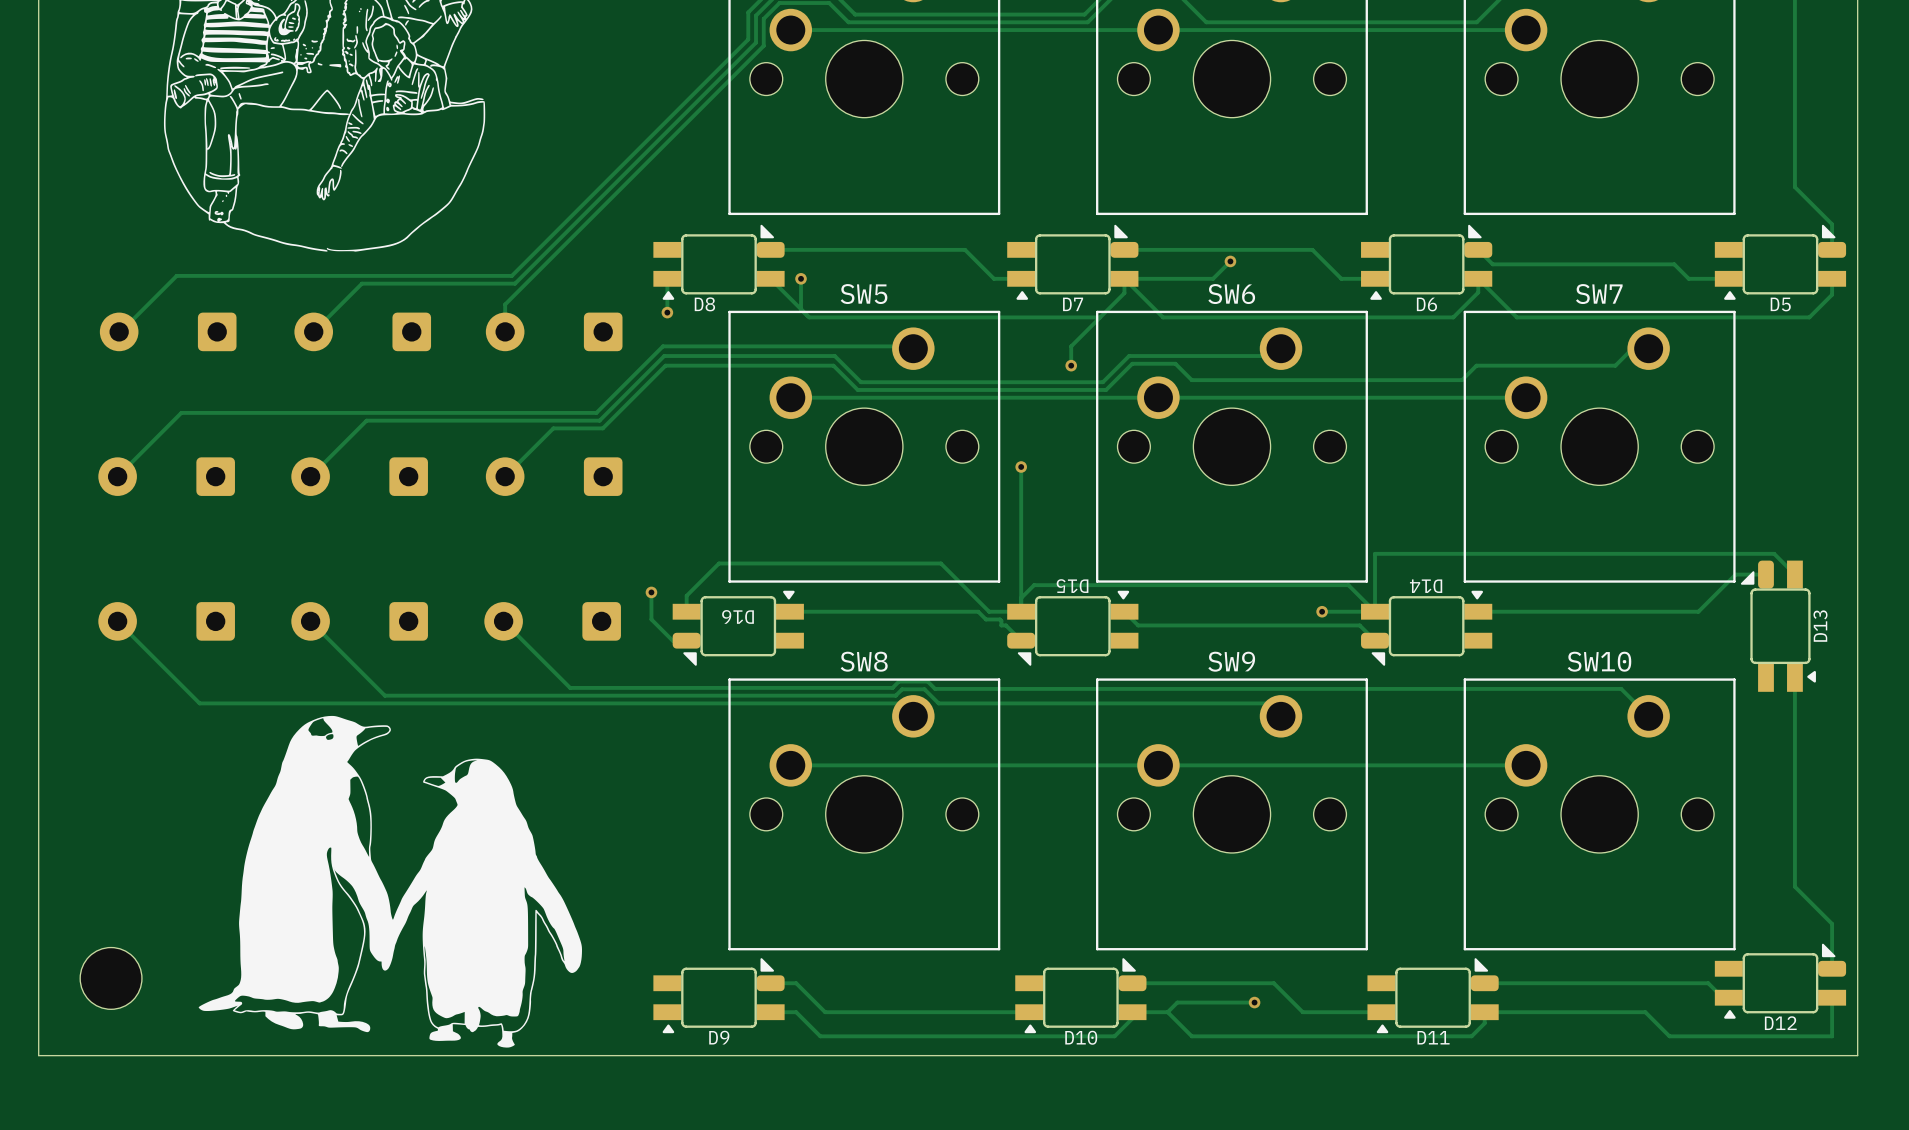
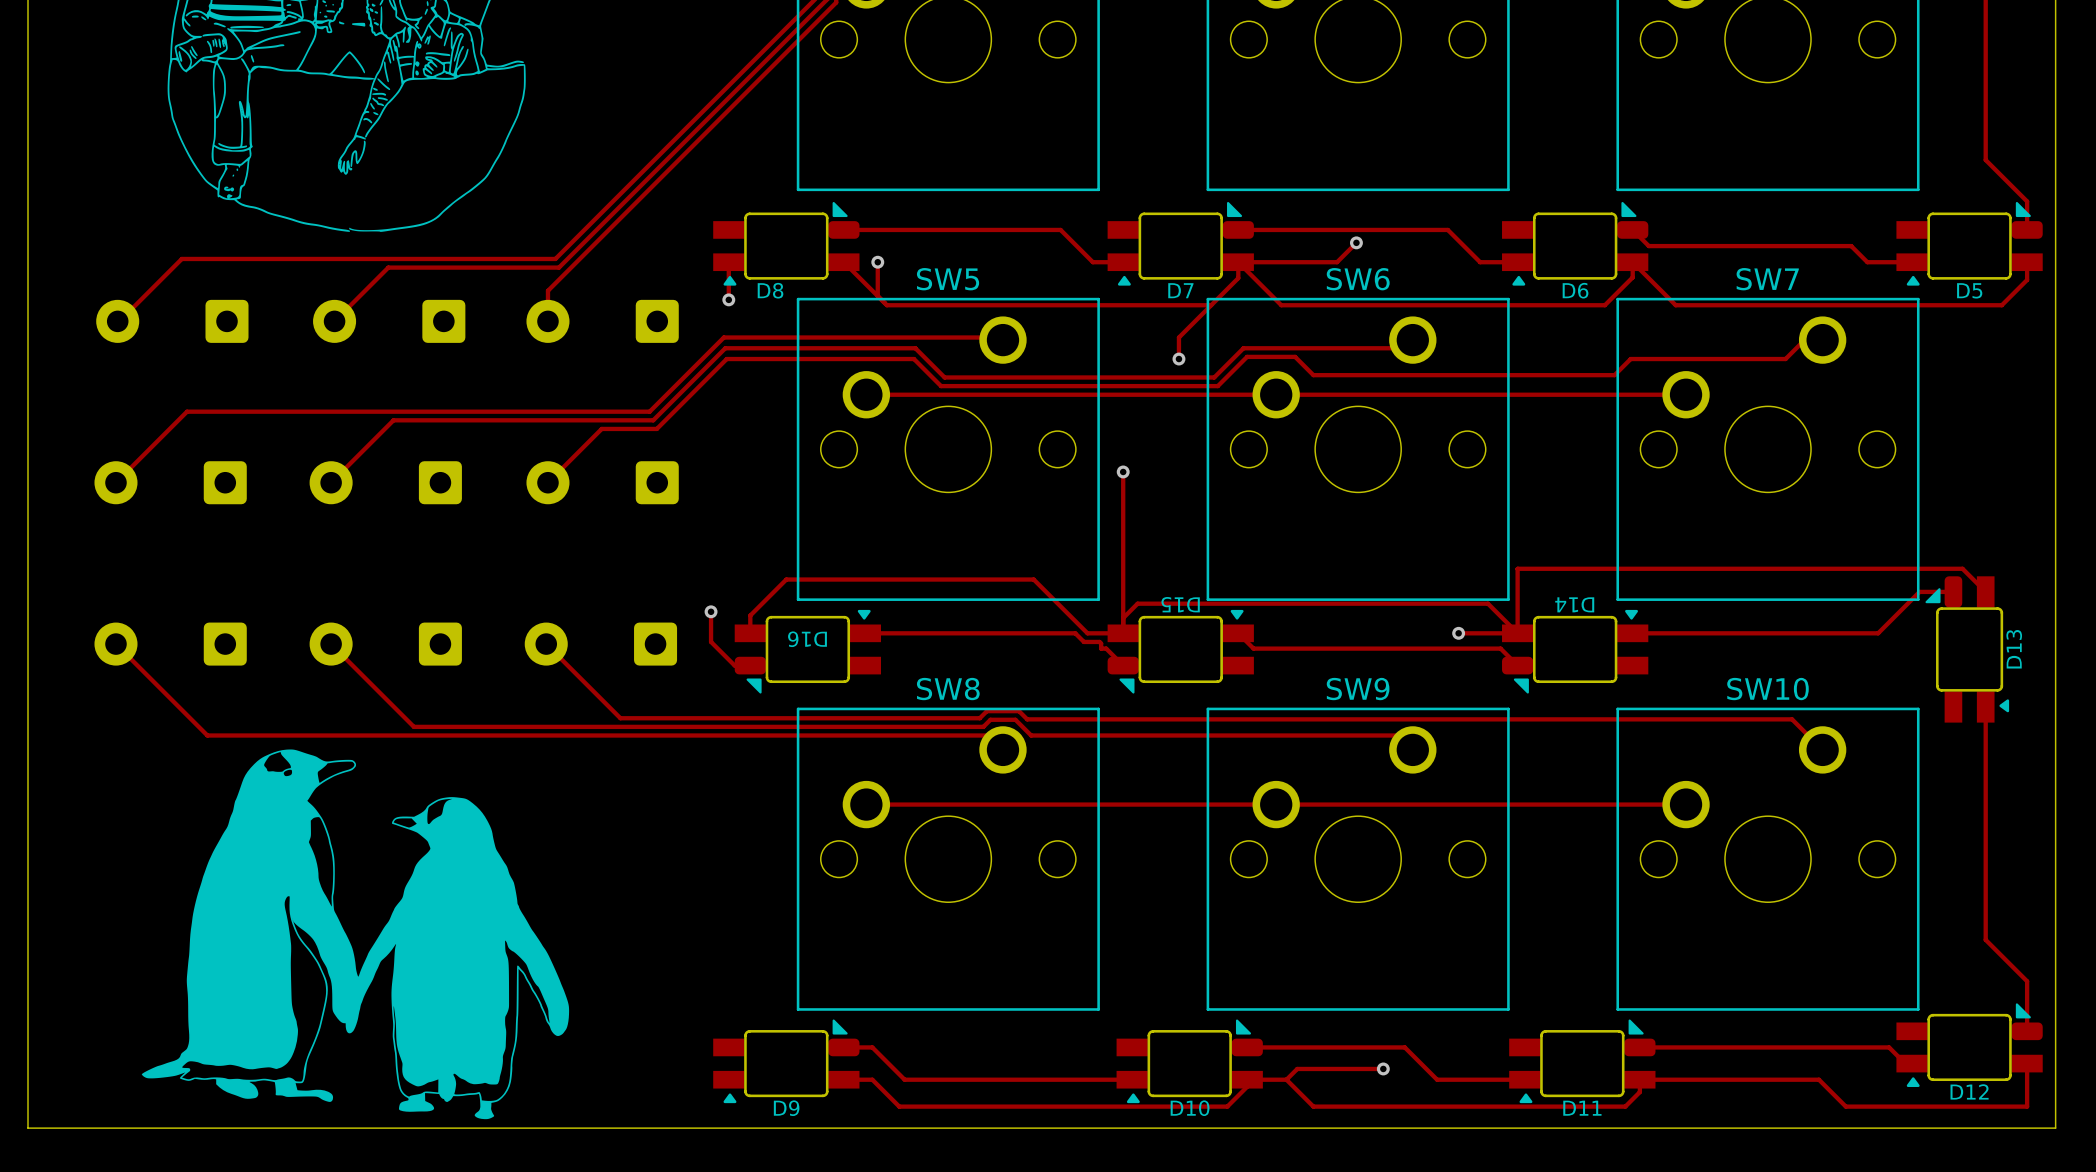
drawing position: (390, 881) -> (355, 934)
part: (111, 978) -> none

